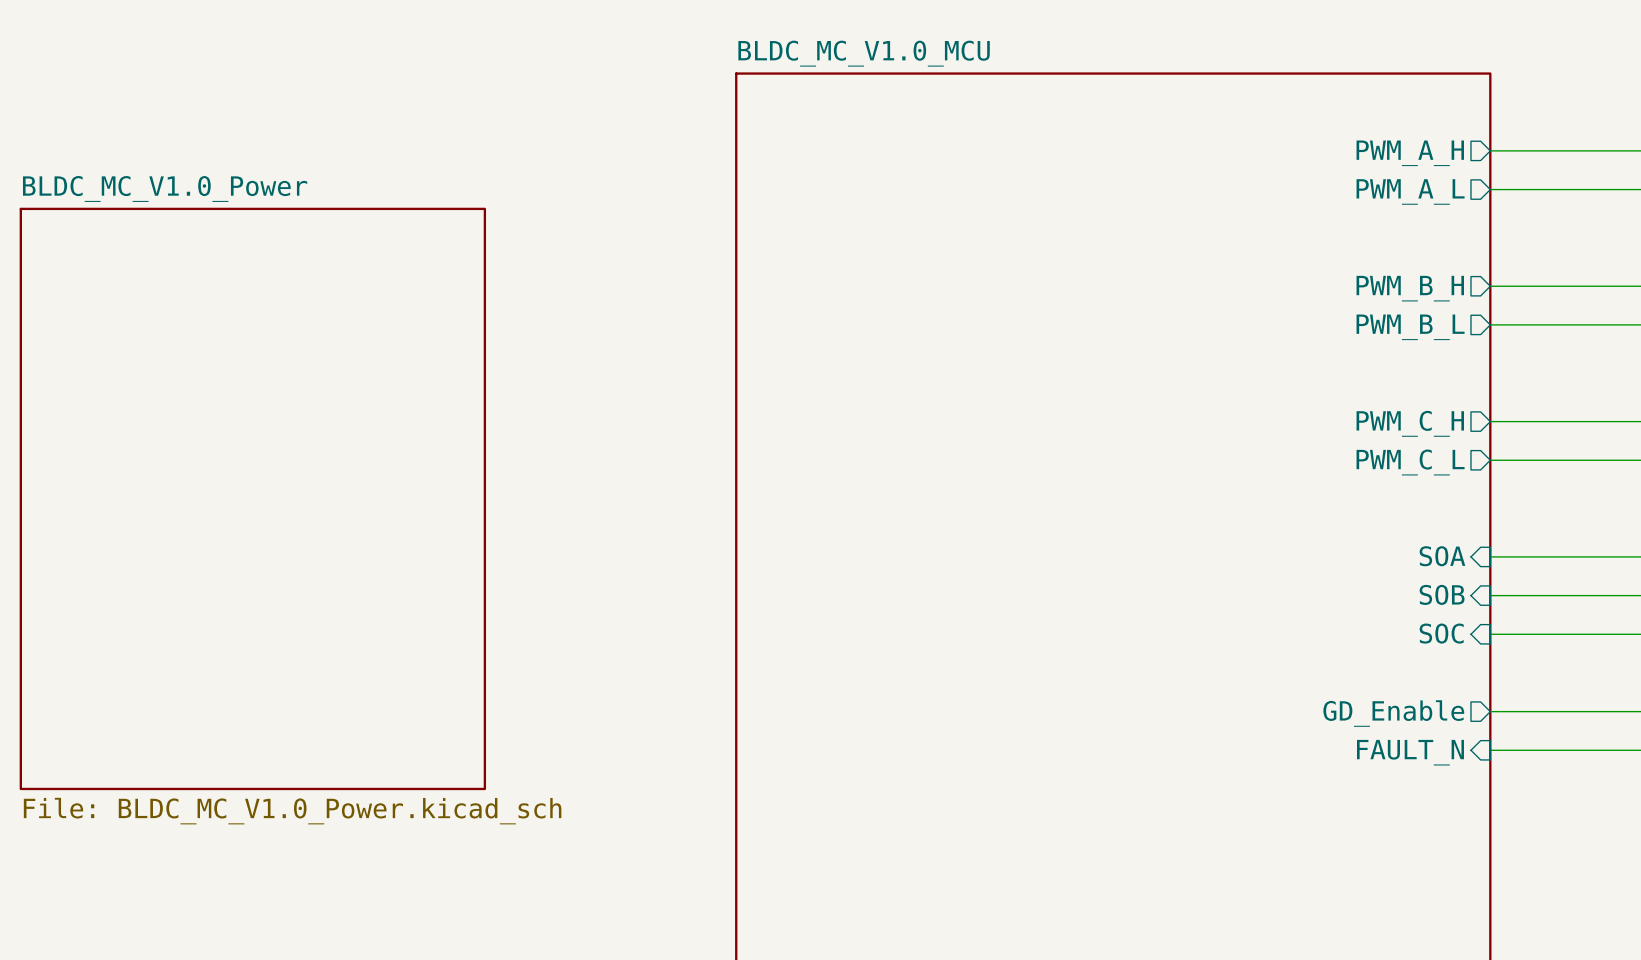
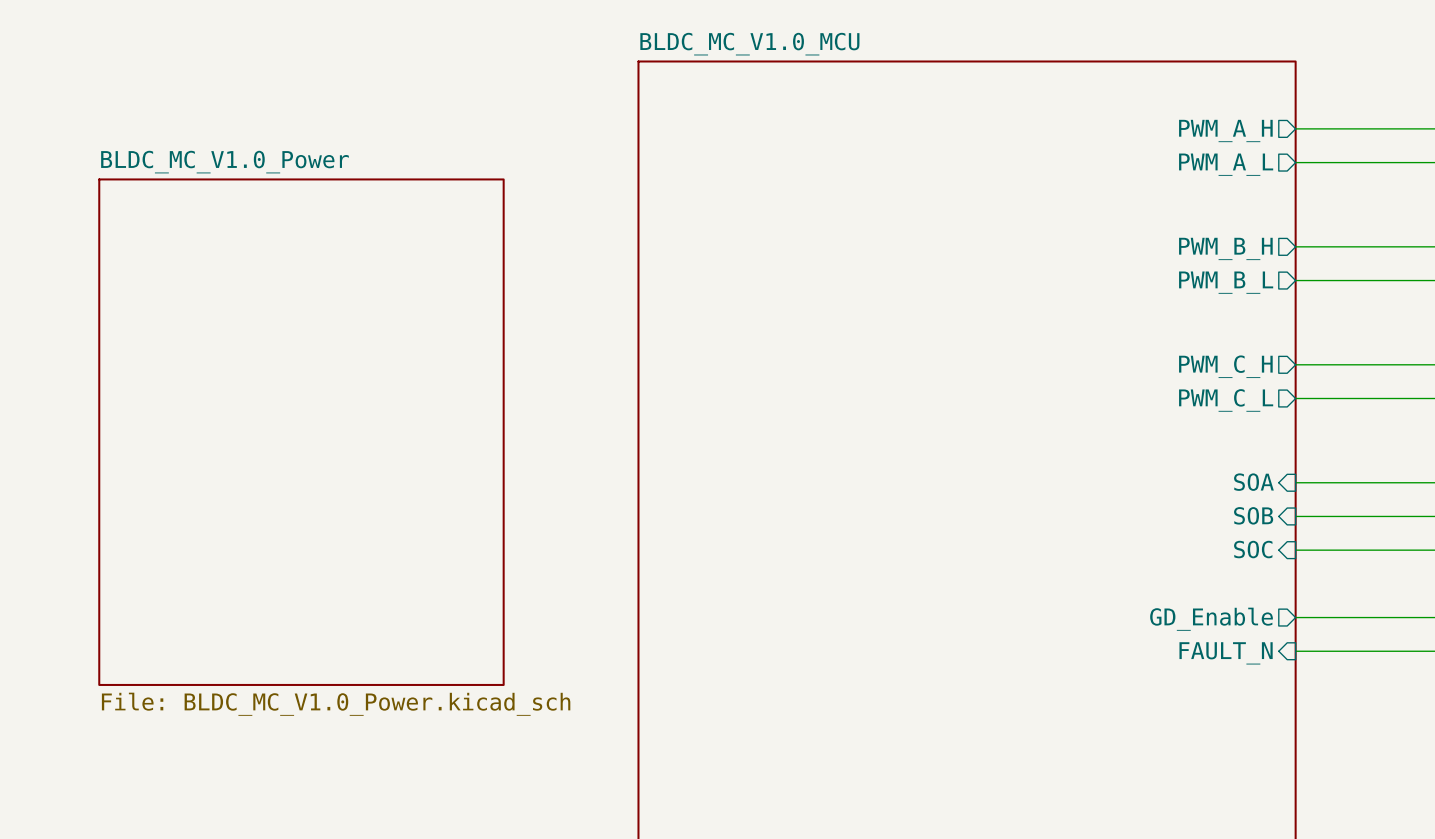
sheet BLDC_MC_V1.0_Power position: (252, 498) -> (301, 432)

